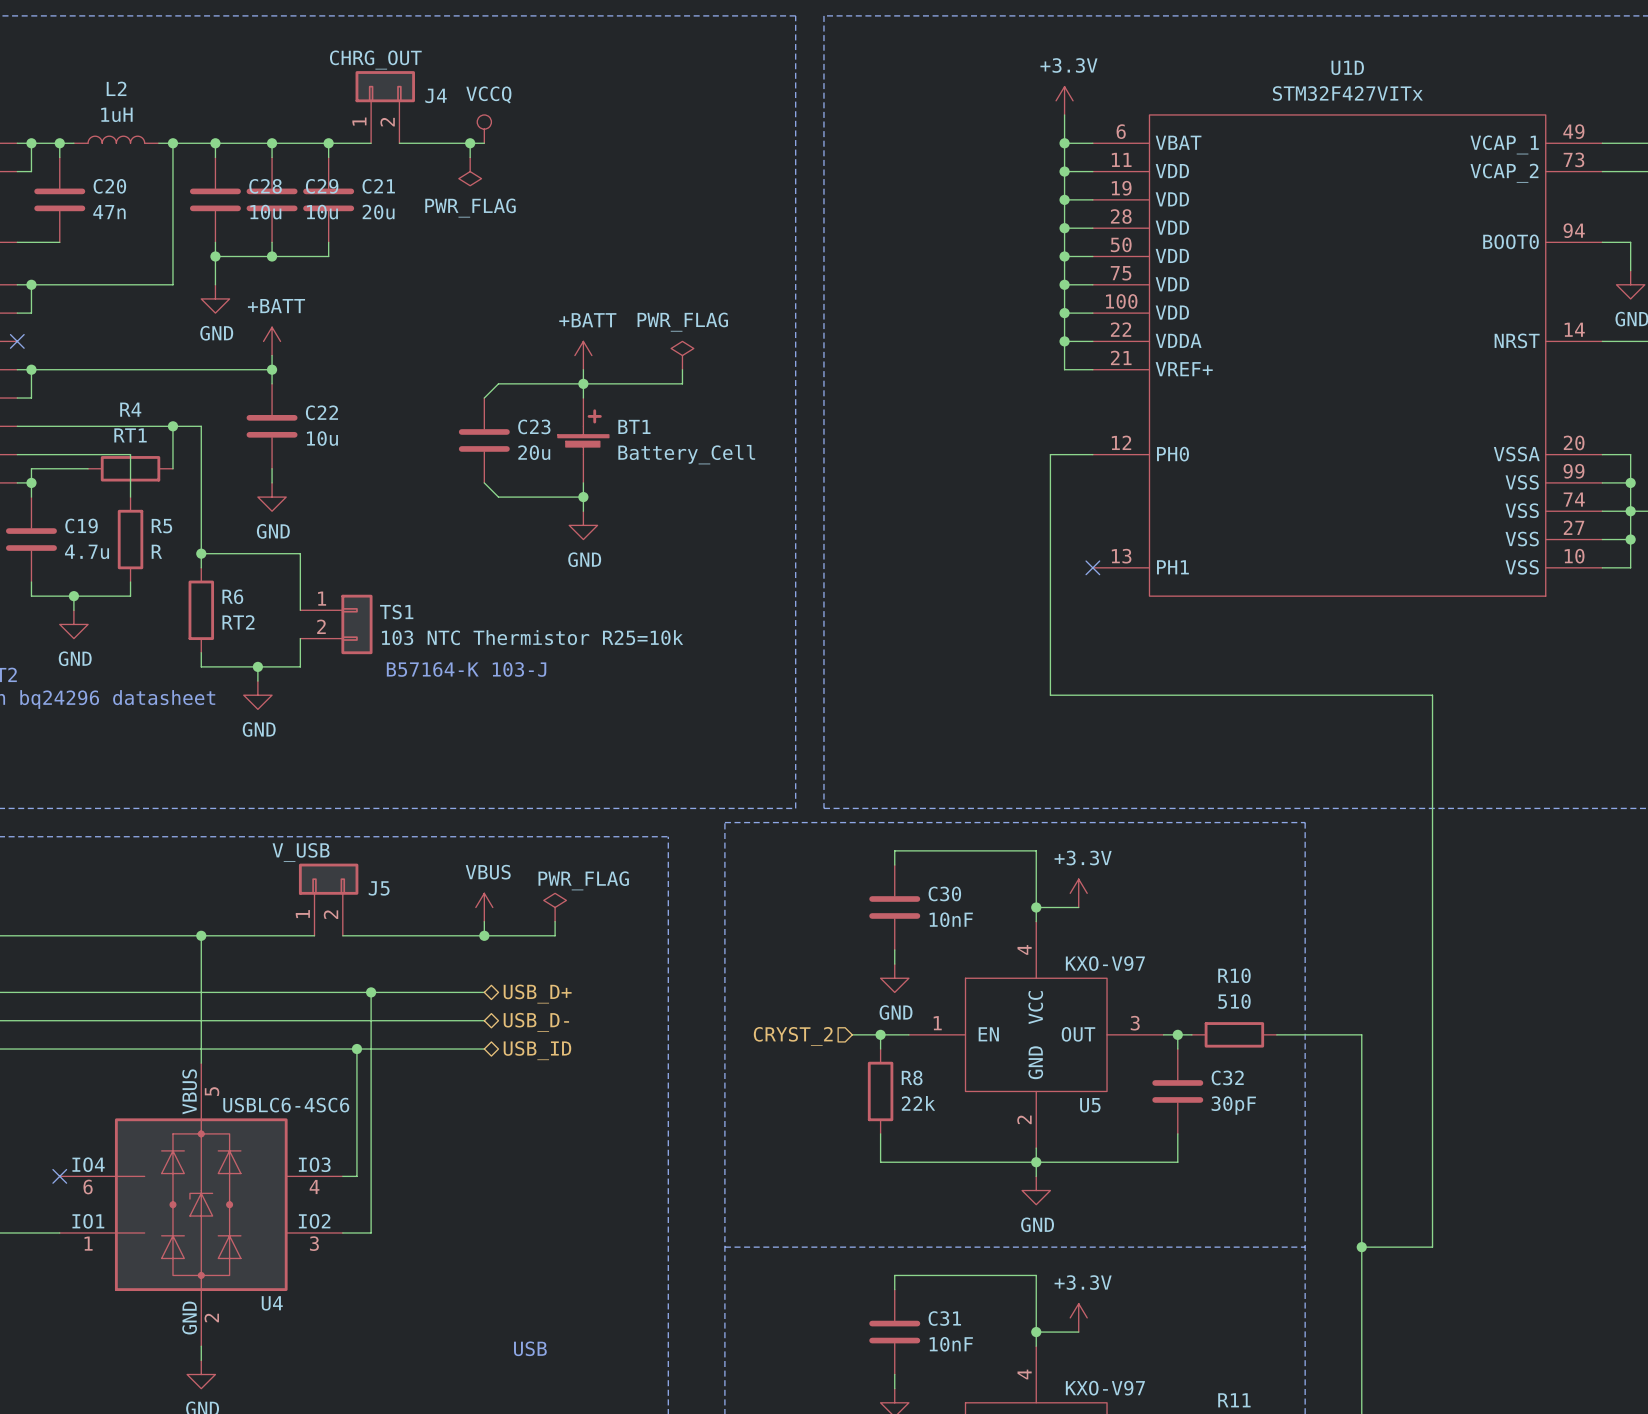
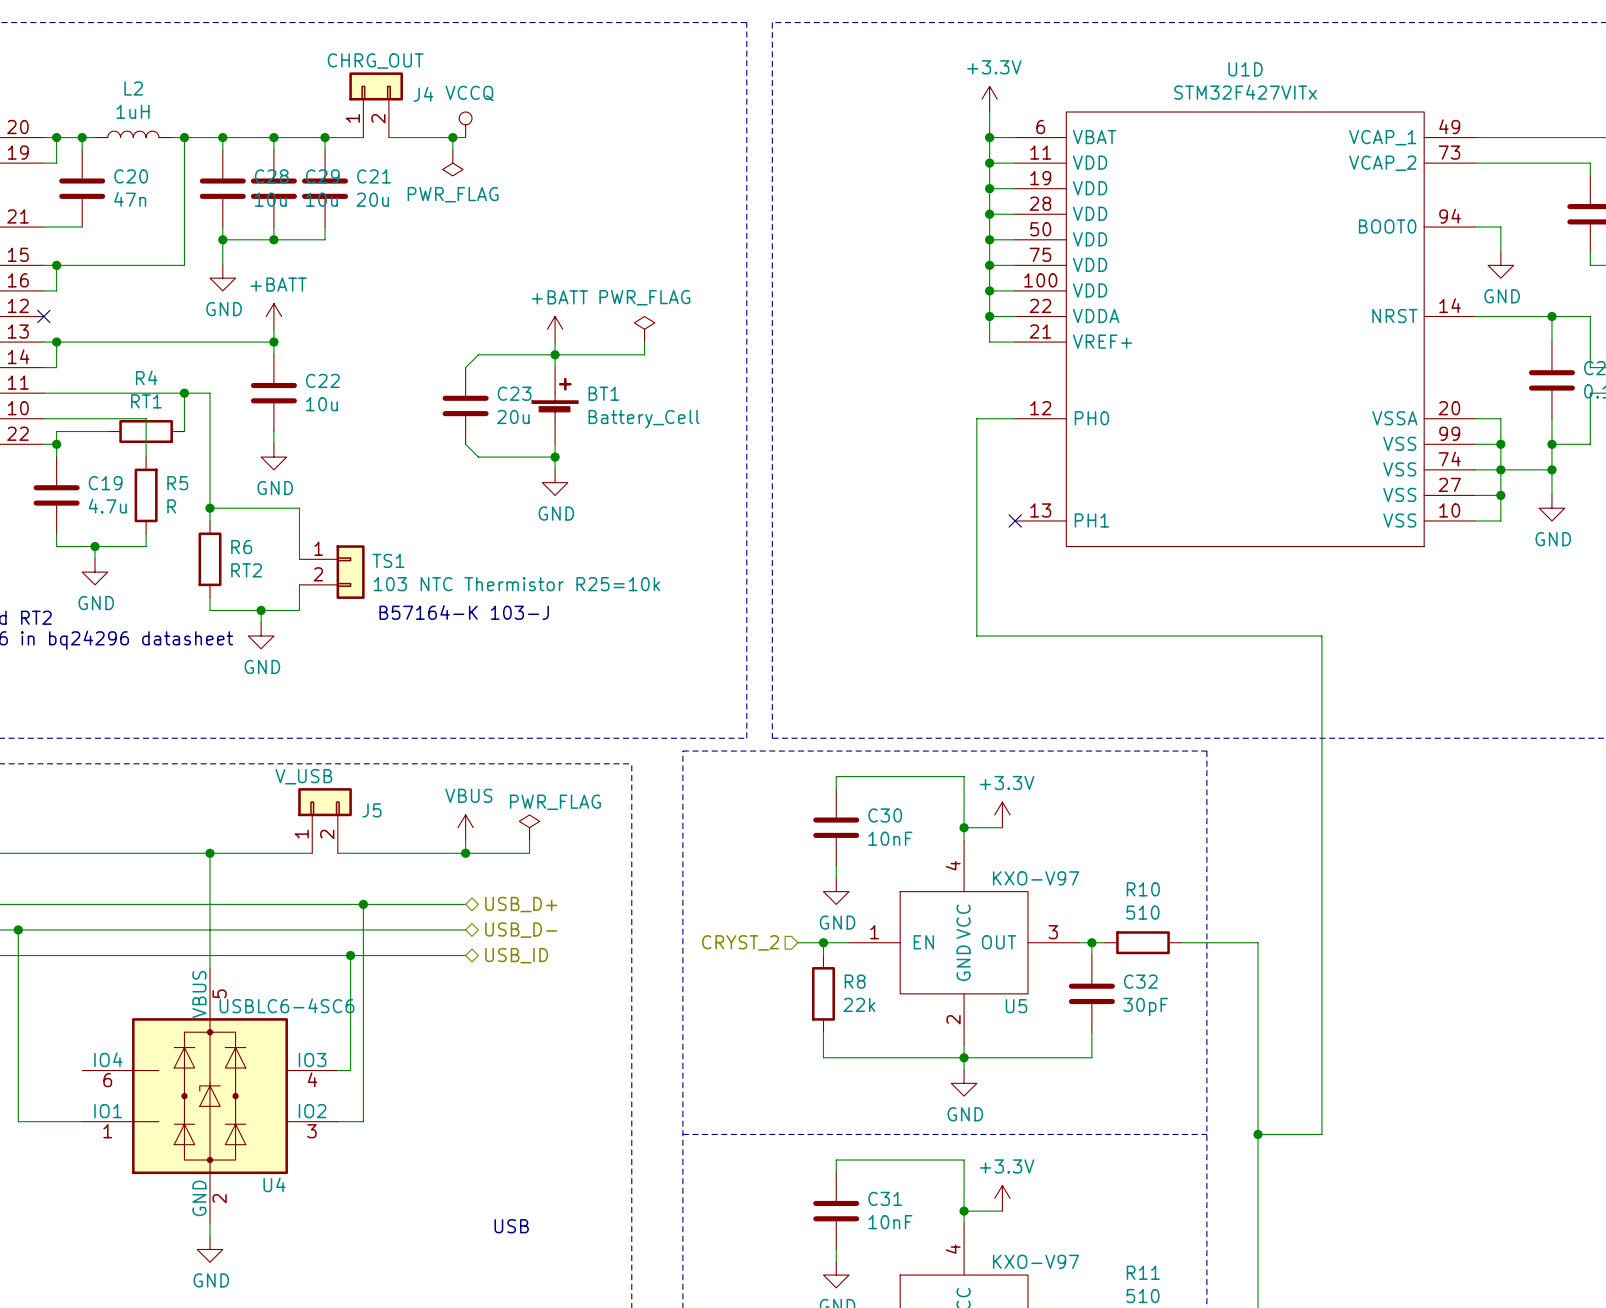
no-connect mark: (59, 1176) -> none

